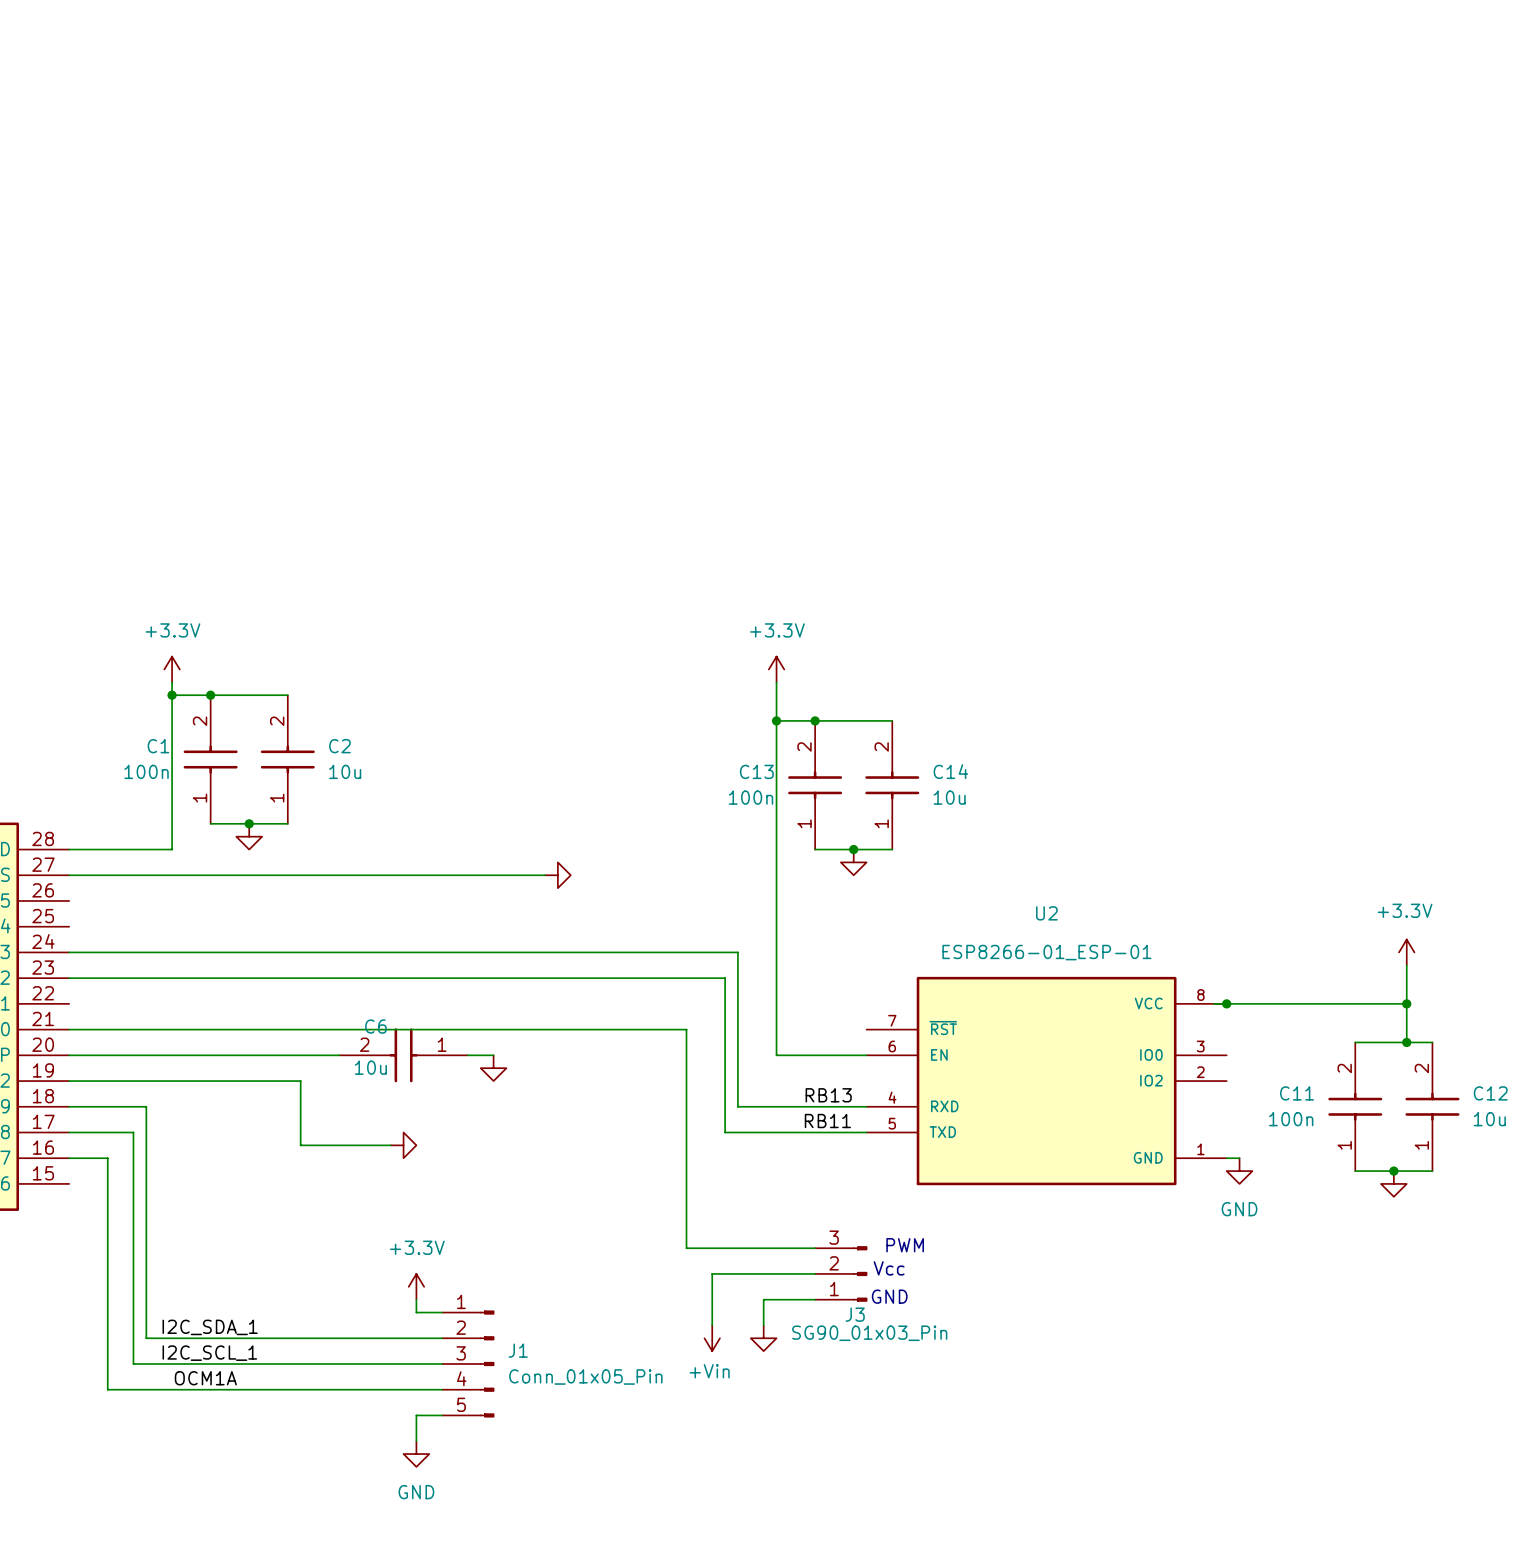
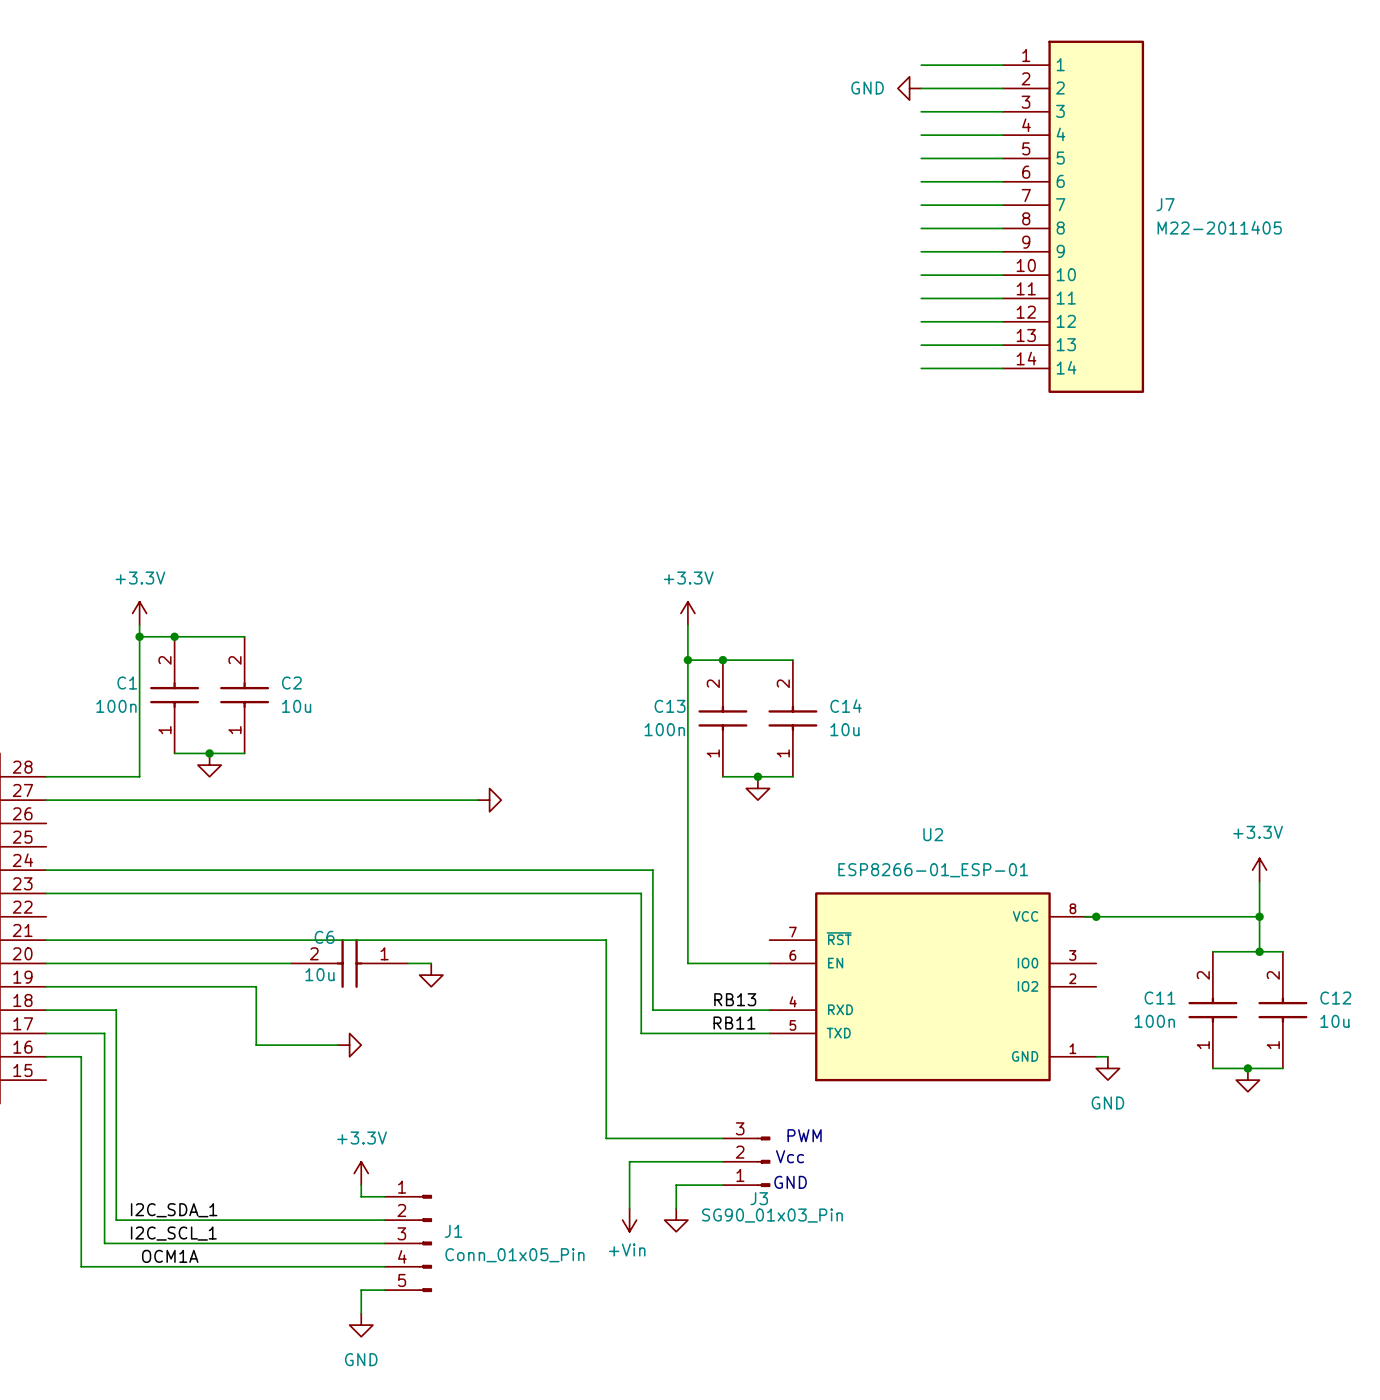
wire: none -> (921, 65) (1002, 65)
power symbol: none -> GND (909, 88)
wire: none -> (921, 88) (1002, 88)
wire: none -> (921, 111) (1002, 111)
wire: none -> (921, 135) (1002, 135)
wire: none -> (921, 158) (1002, 158)
wire: none -> (921, 181) (1002, 181)
wire: none -> (921, 205) (1002, 205)
J7: none -> M22-2011405 (1073, 216)
wire: none -> (921, 228) (1002, 228)
wire: none -> (921, 251) (1002, 251)
wire: none -> (921, 275) (1002, 275)
wire: none -> (921, 298) (1002, 298)
wire: none -> (921, 321) (1002, 321)
wire: none -> (921, 345) (1002, 345)
wire: none -> (921, 368) (1002, 368)

